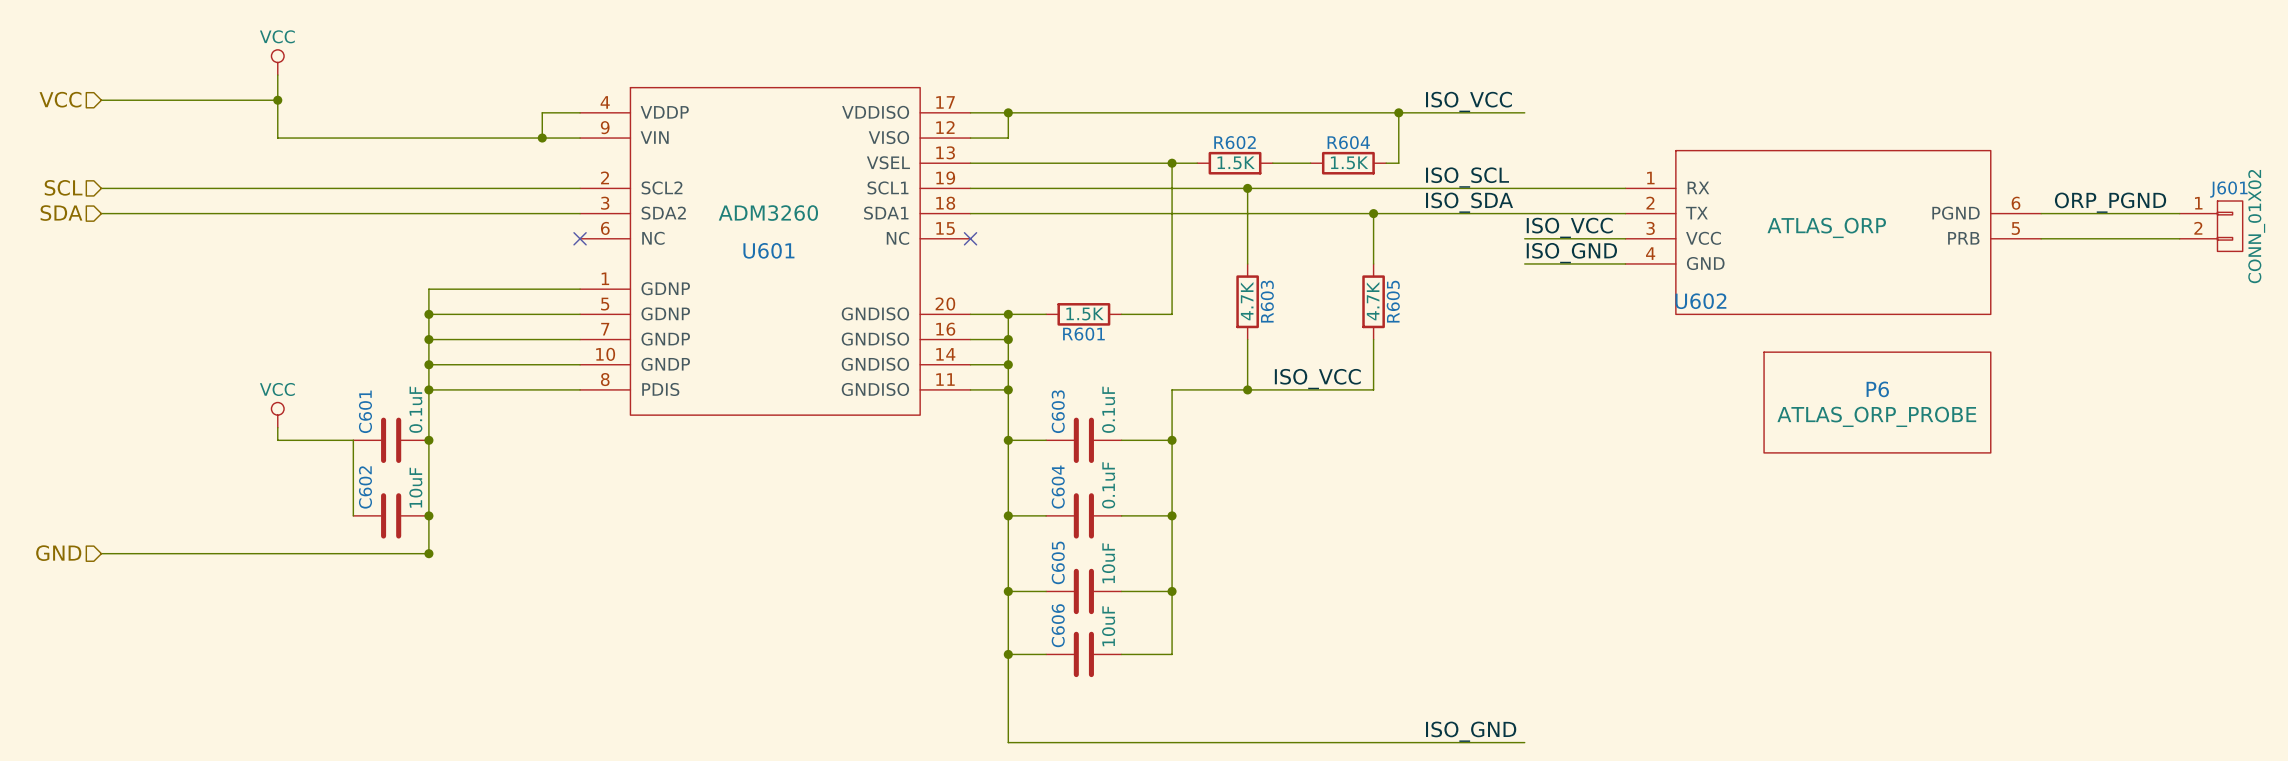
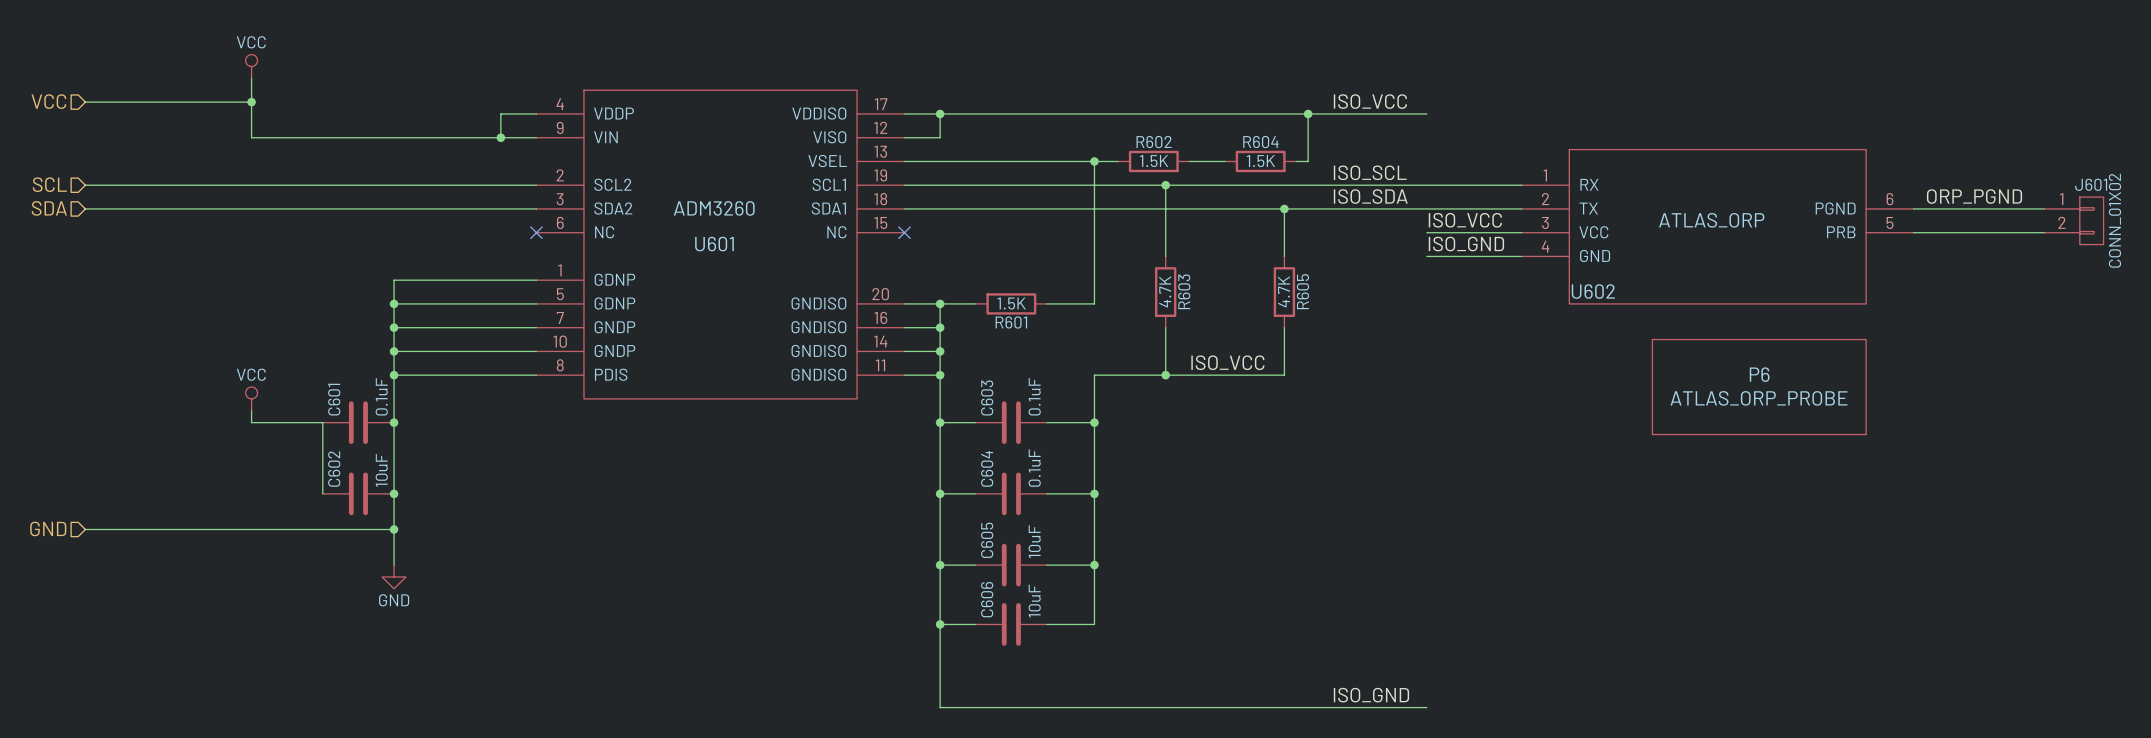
wire: none -> (394, 529) (394, 565)
power symbol: none -> GND (394, 576)

